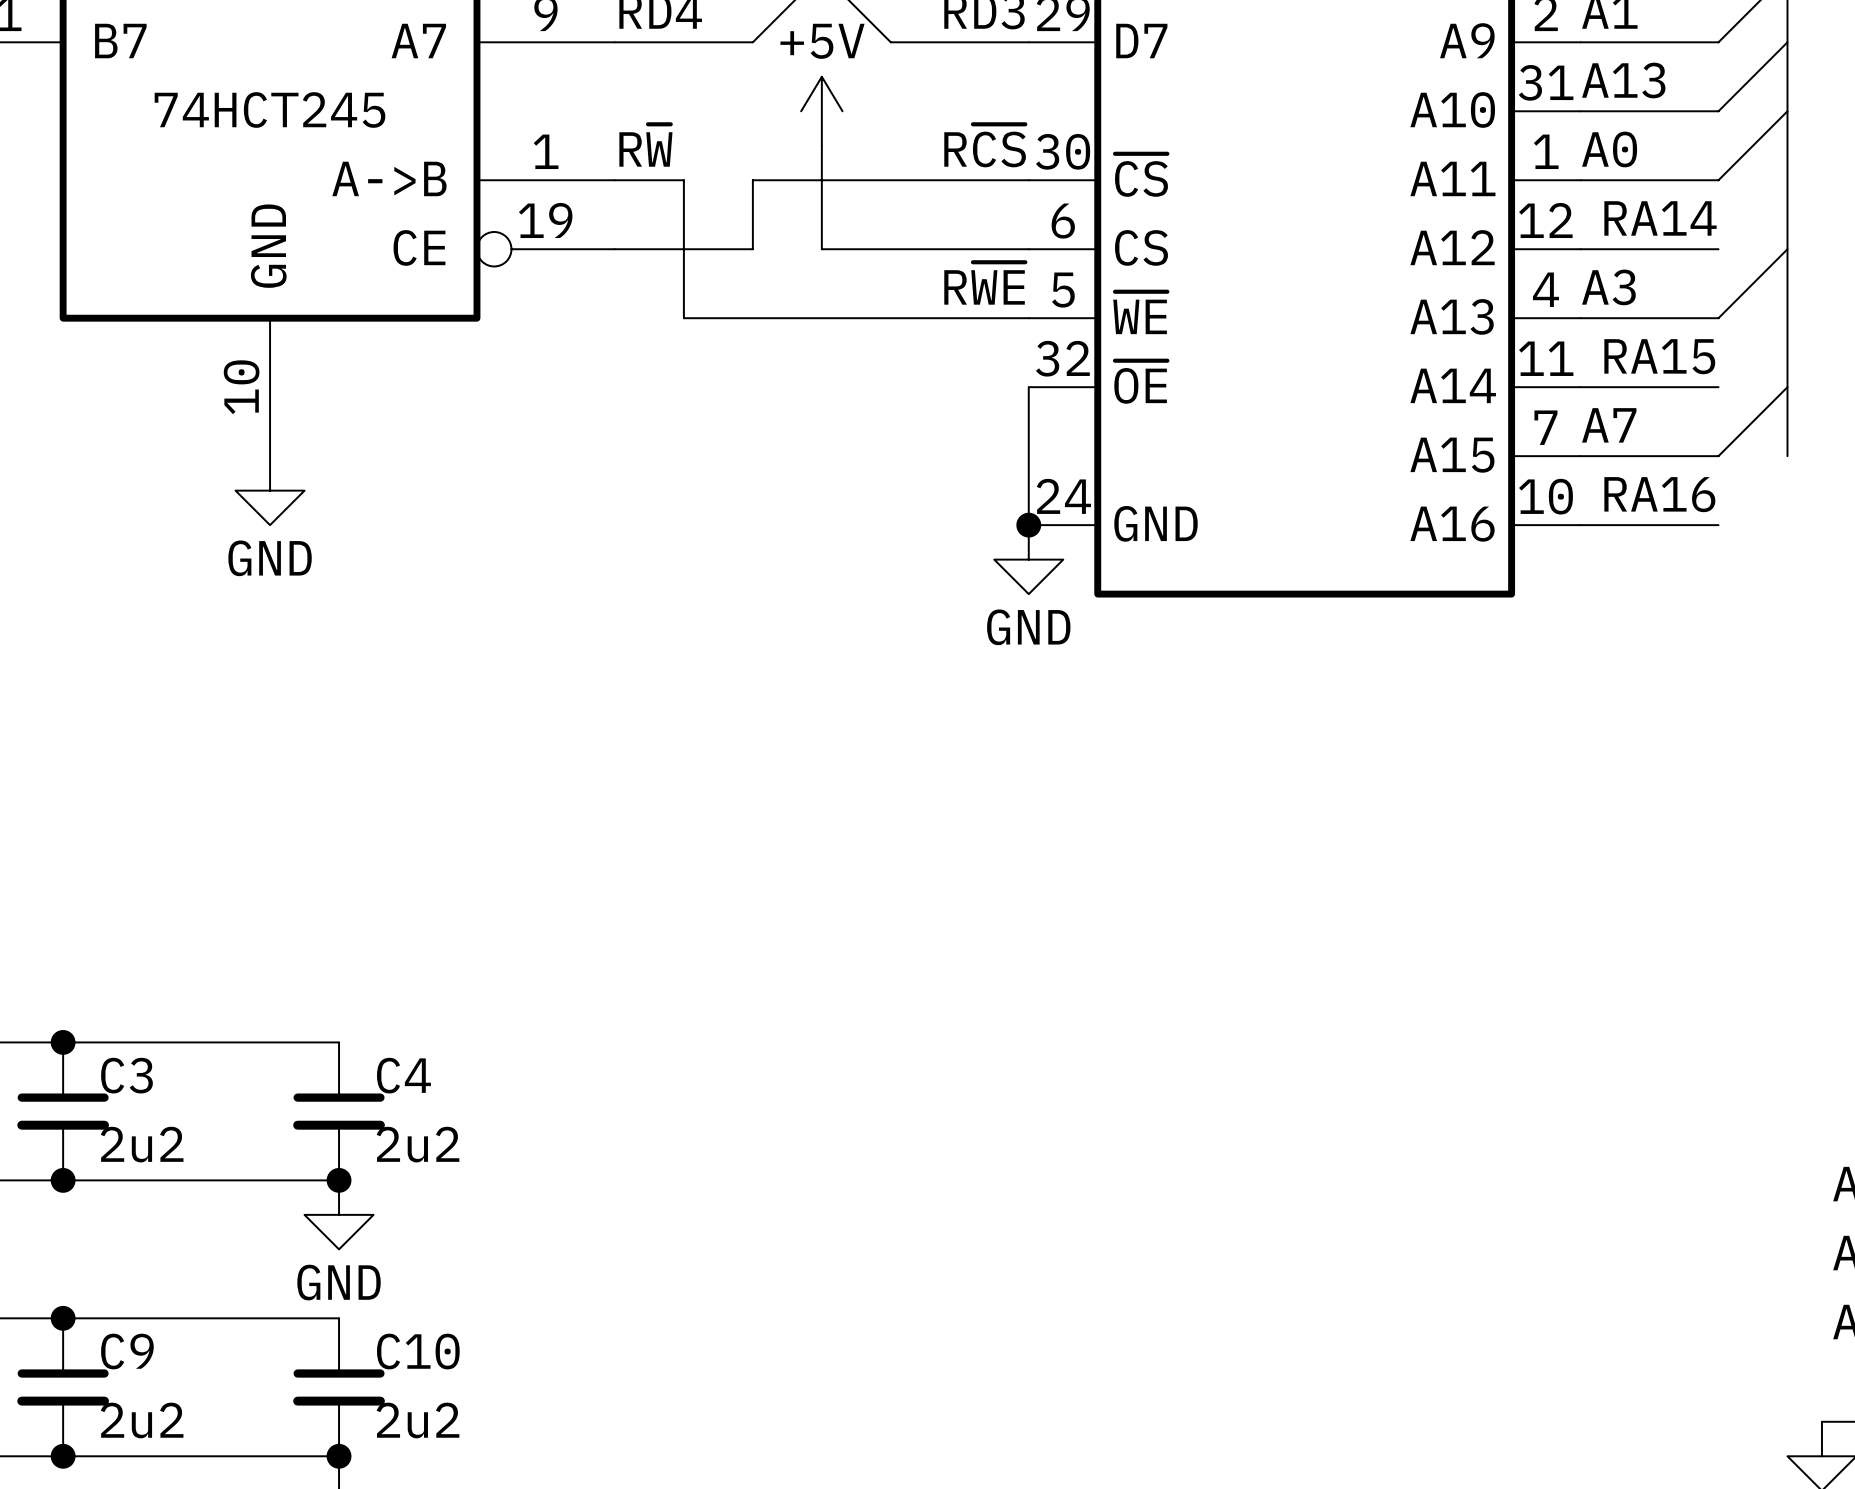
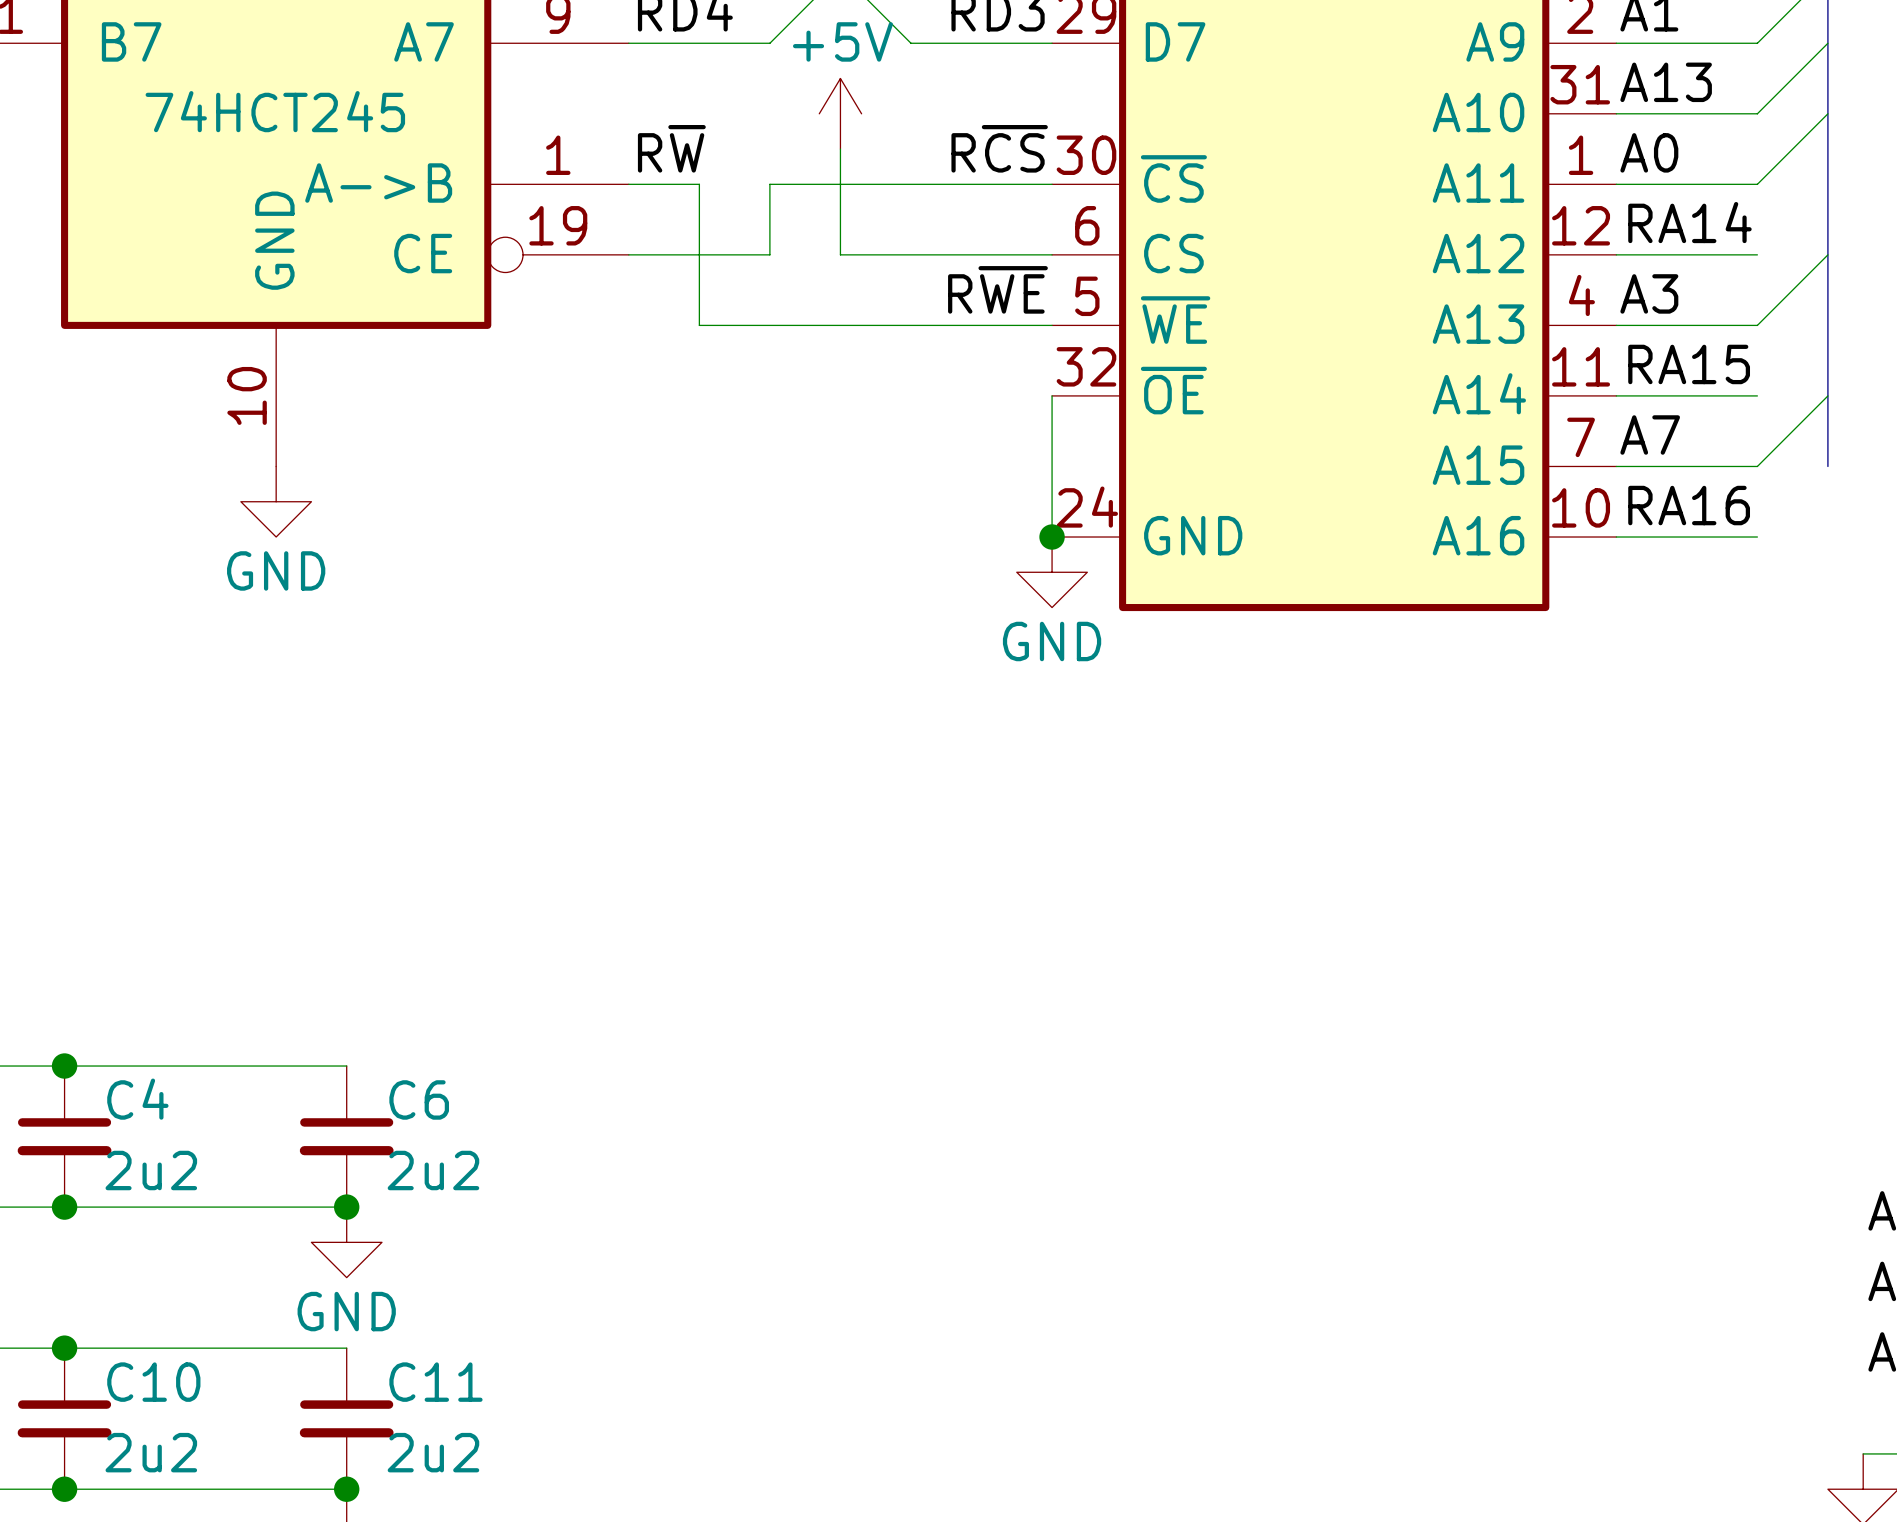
C3 name: C3 (126, 1075) -> C4 (137, 1099)
C4 name: C4 (403, 1075) -> C6 (419, 1099)
C9 name: C9 (127, 1351) -> C10 (153, 1382)
C10 name: C10 (418, 1351) -> C11 (435, 1382)

